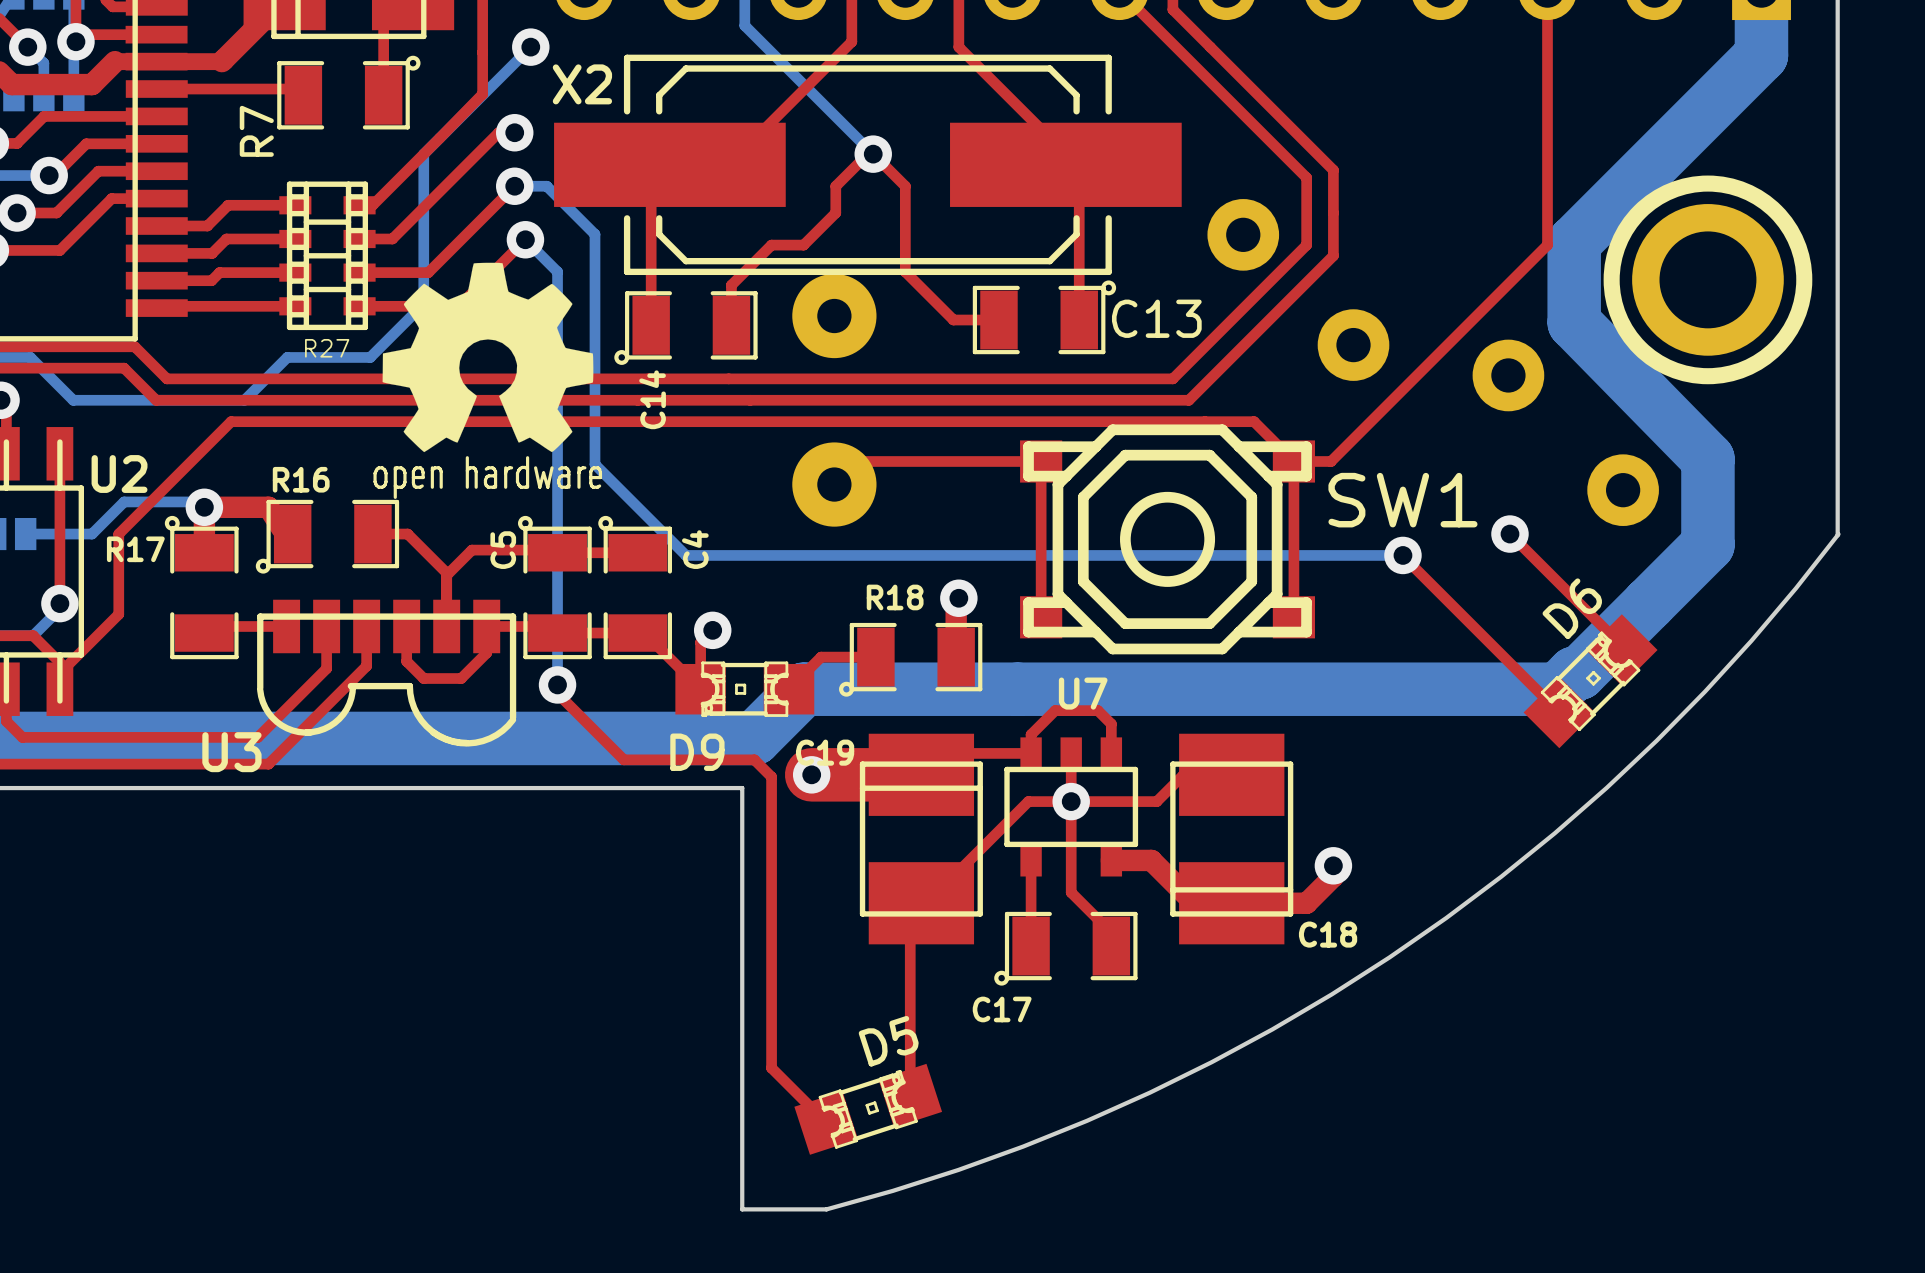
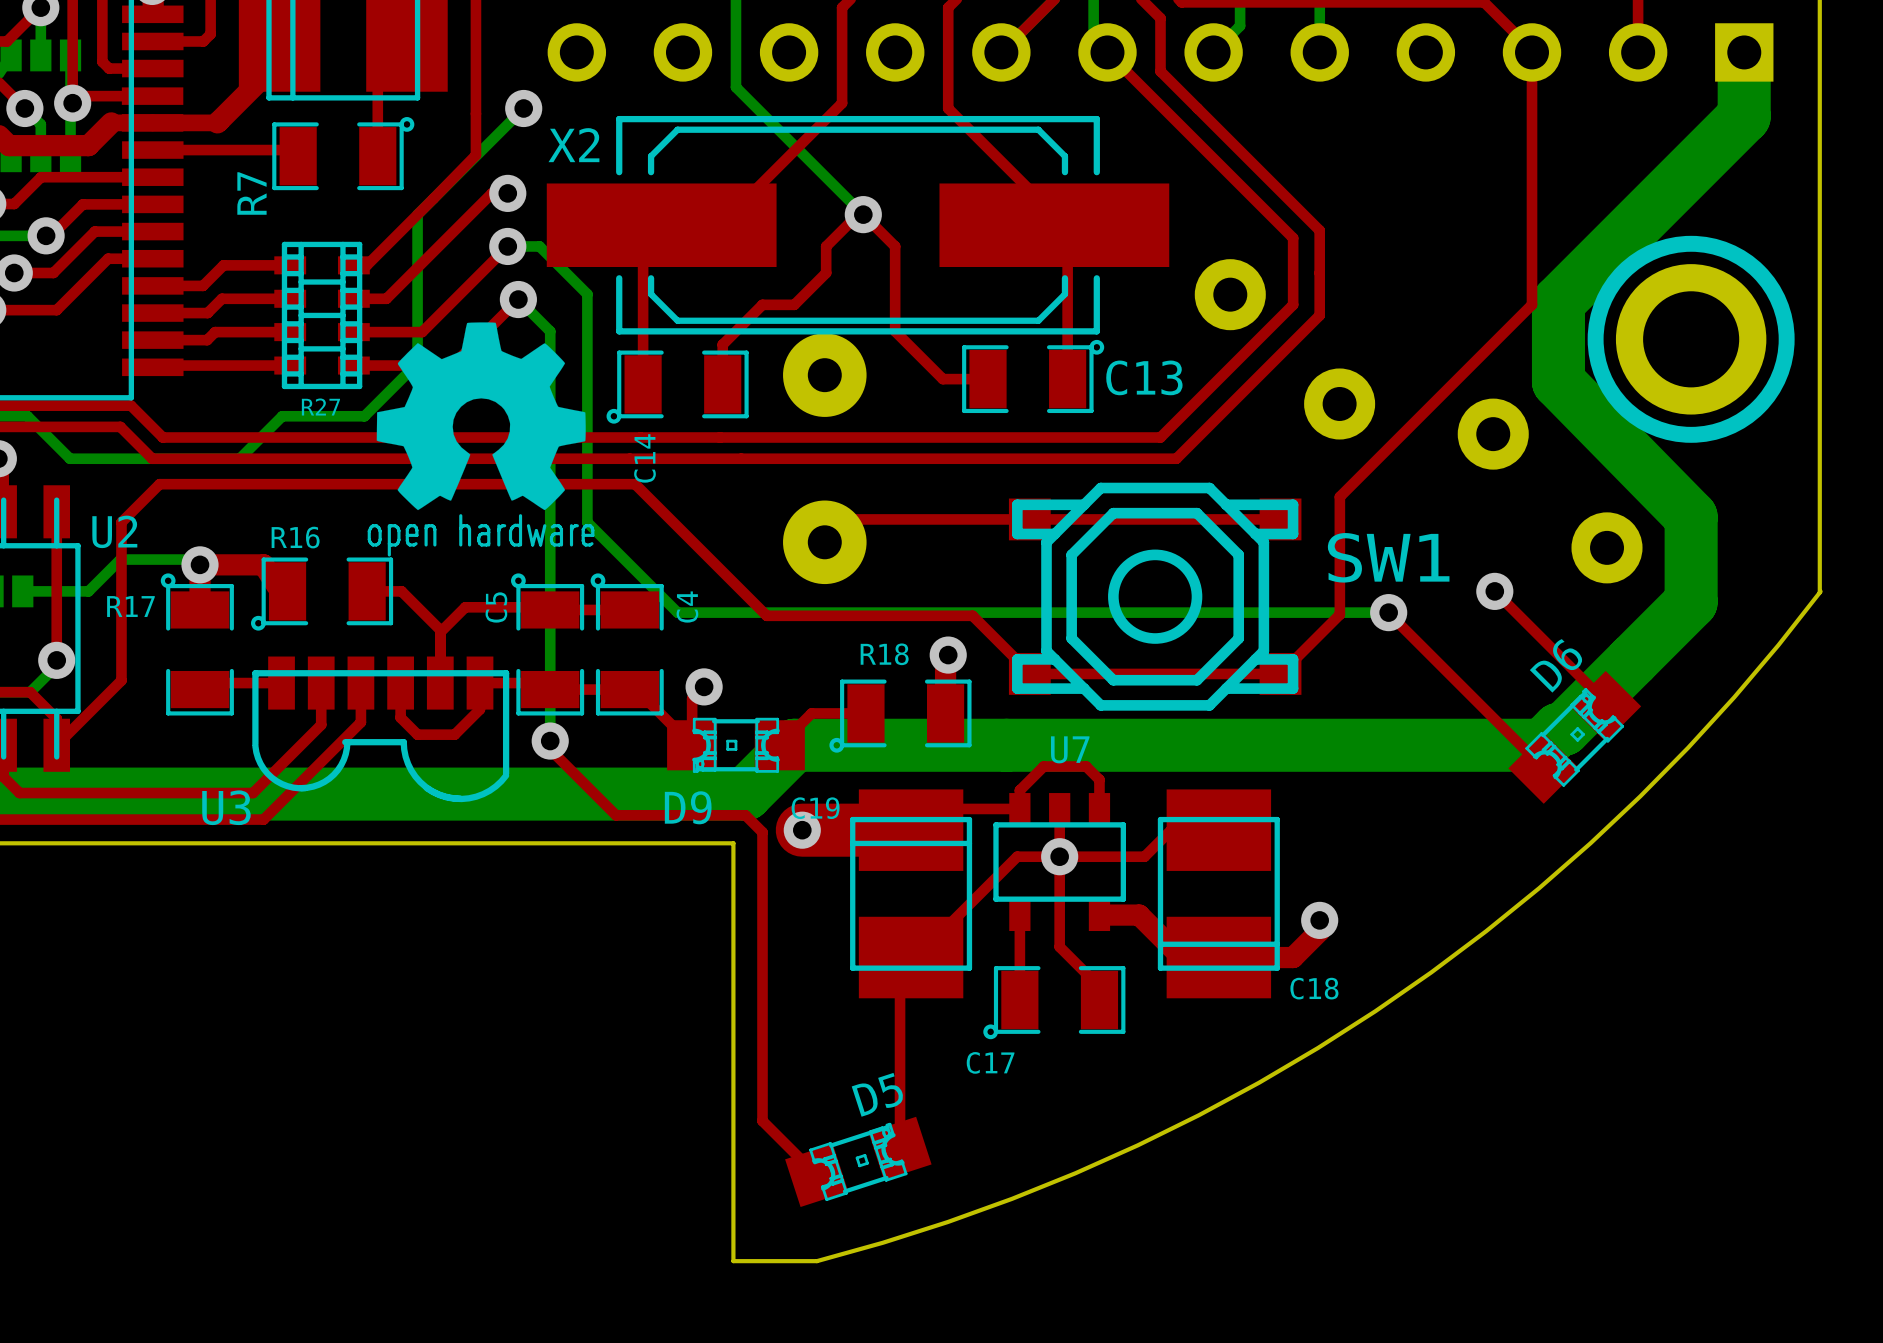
top track: (1353, 438) (1331, 461) (1293, 461) -> (1339, 496) (1339, 614) (1280, 673) (1029, 673)
top track: (1041, 461) (1041, 616) -> (1029, 519) (1280, 519)
top track: (1293, 461) (1254, 421) (231, 421) (118, 534) (118, 614) (59, 673) -> none
top track: (1293, 461) (1293, 617) -> none
top track: none -> (1029, 673) (972, 615) (766, 615) (635, 484) (159, 484) (121, 522) (121, 680) (56, 745)

